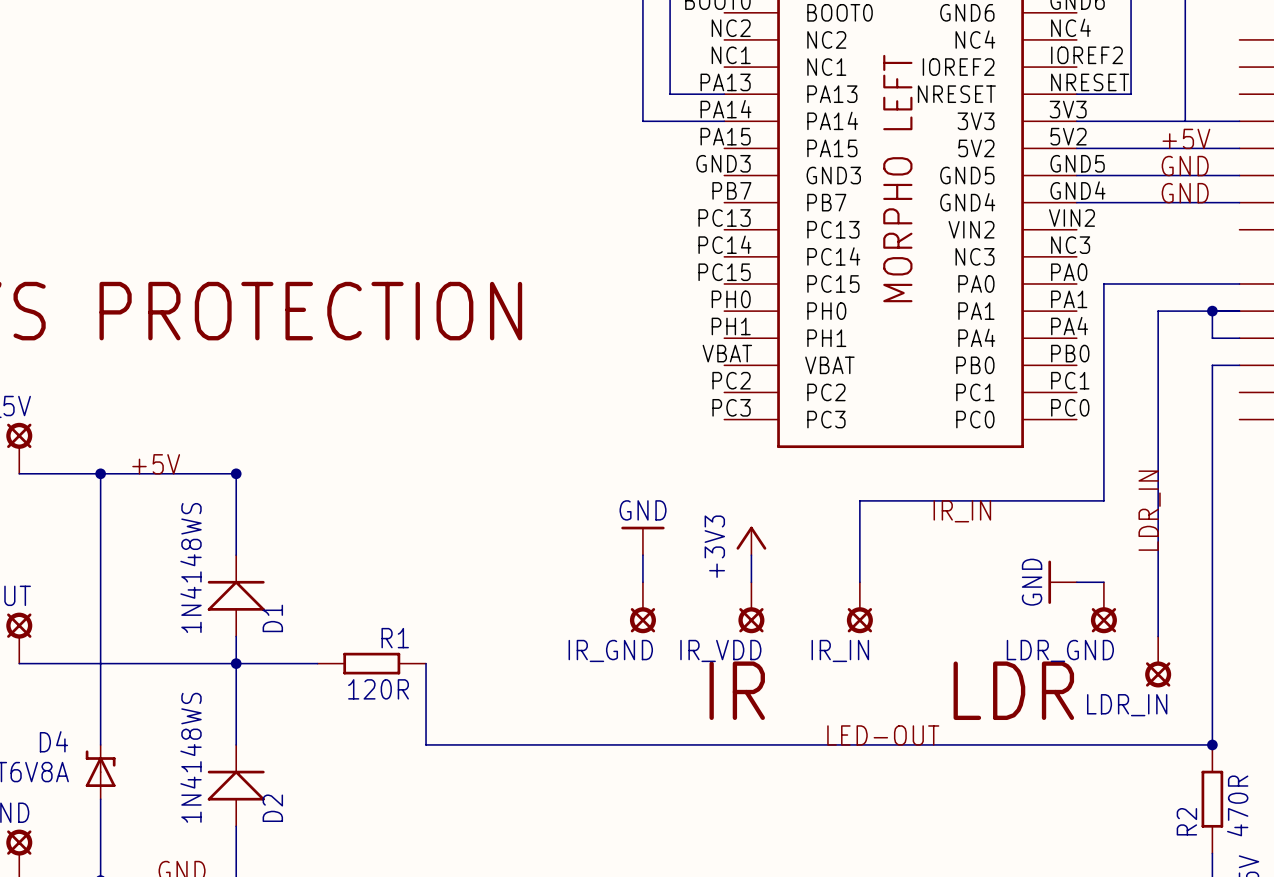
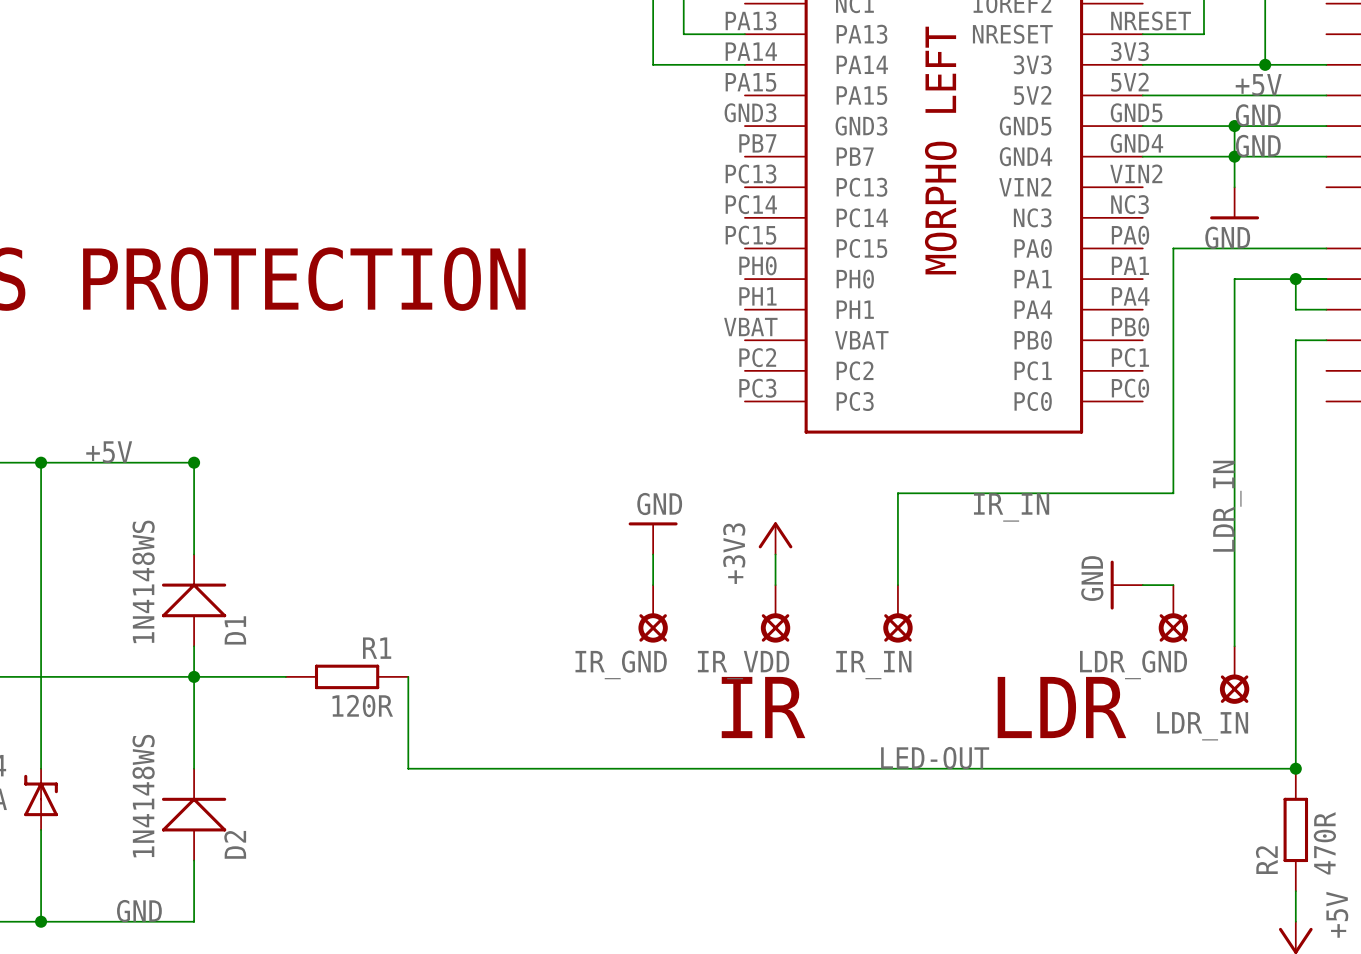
junction: none -> (1265, 64)
wire: none -> (1234, 126) (1234, 187)
junction: none -> (1234, 126)
junction: none -> (1234, 156)
power symbol: none -> GND (1234, 203)

